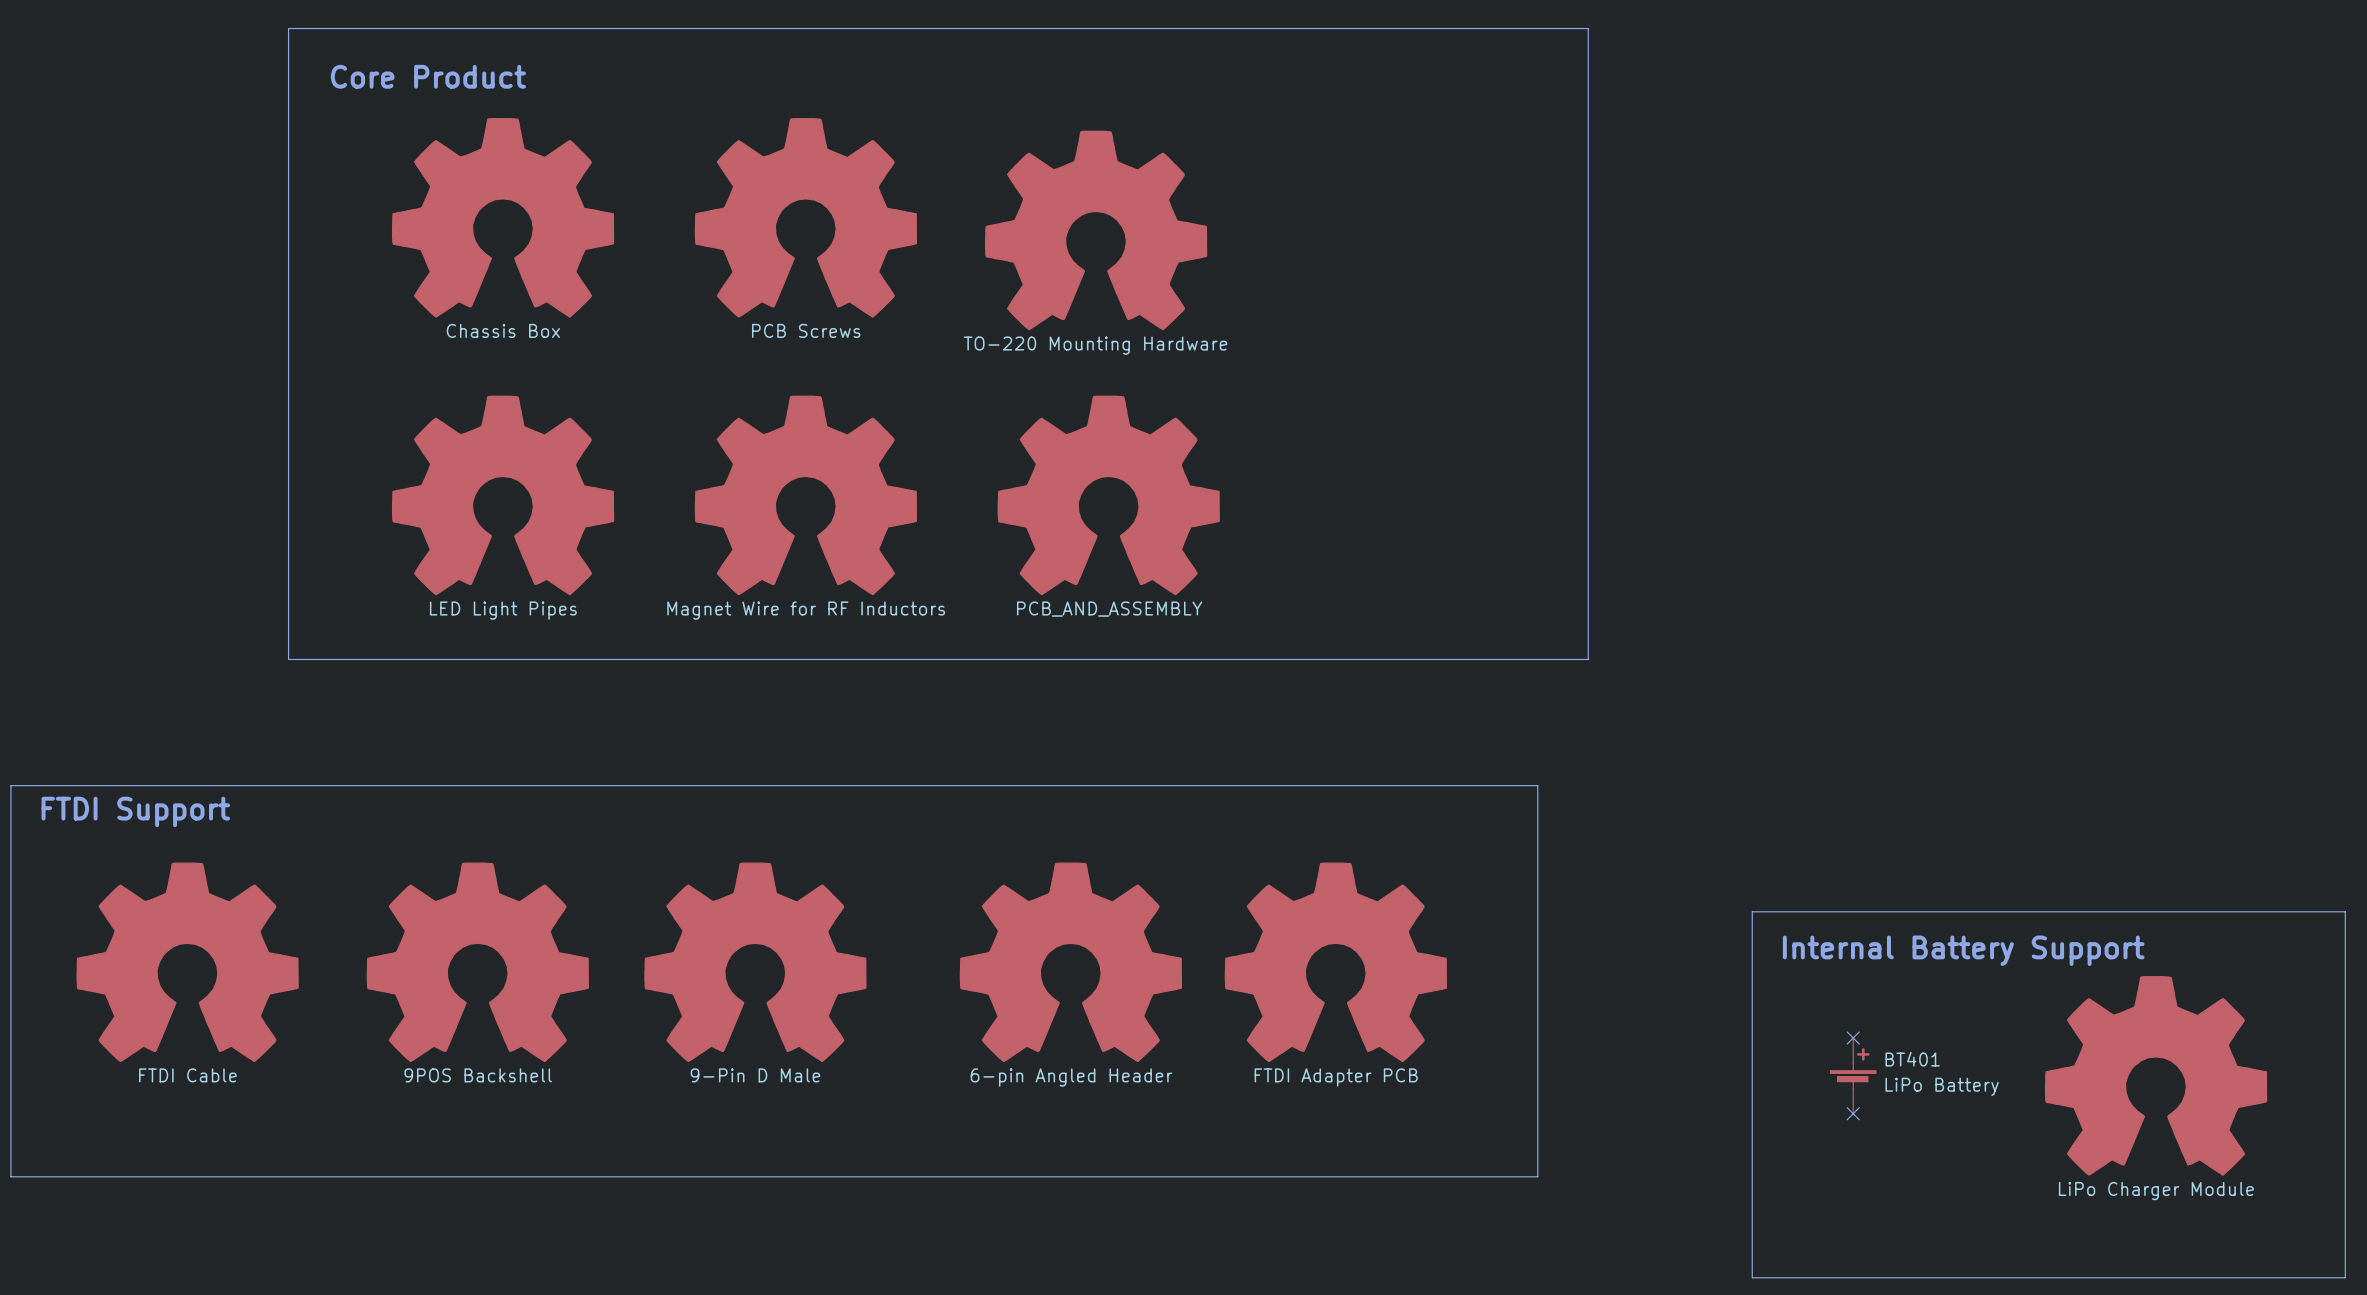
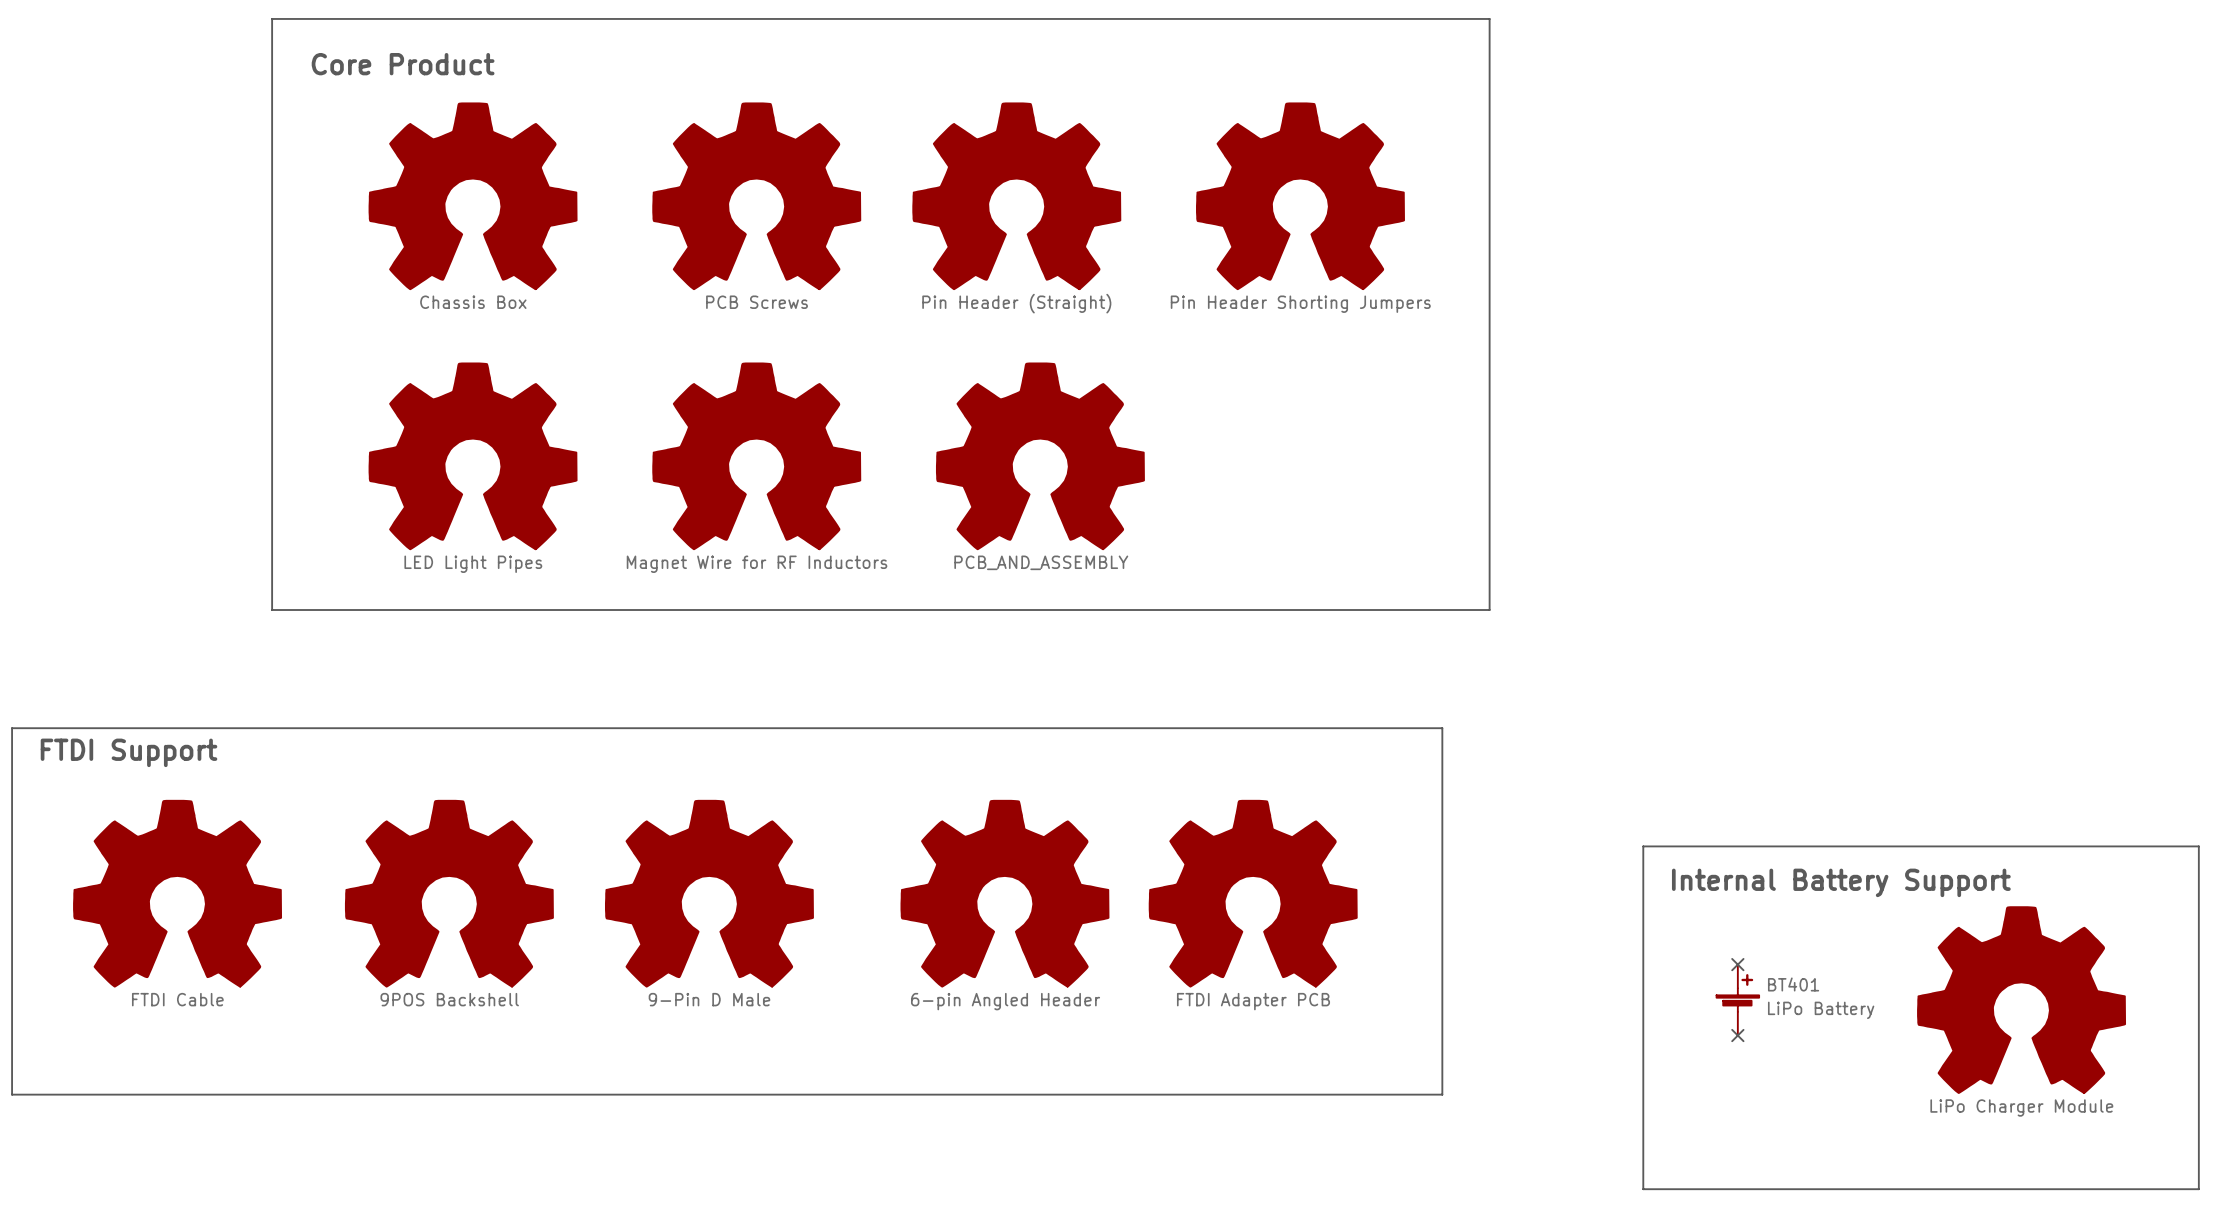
part: none -> Pin Header (Straight) (1016, 196)
part: none -> Pin Header Shorting Jumpers (1300, 196)
part: TO-220 Mounting Hardware (1096, 230) -> none

